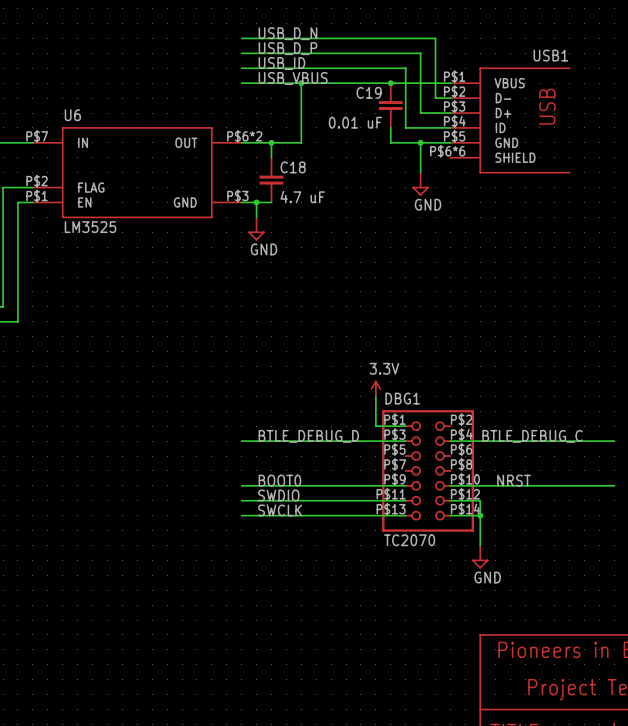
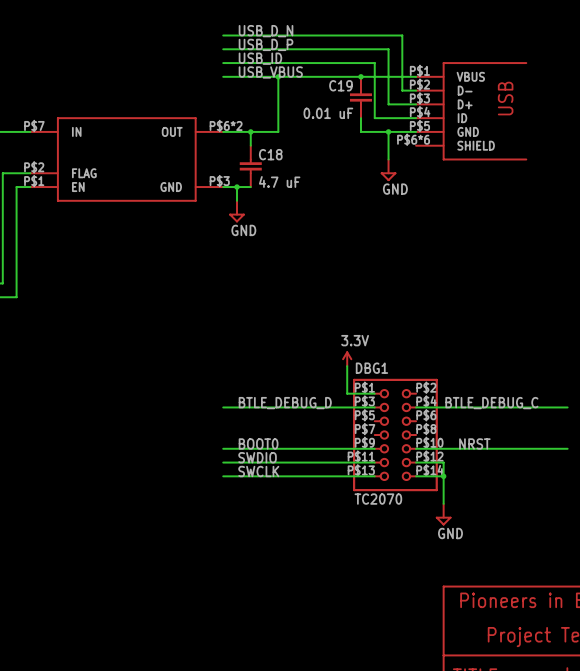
USB1 name: USB1 (550, 55) -> none
U6 name: U6 (72, 115) -> none
U6 value: LM3525 (90, 227) -> none

